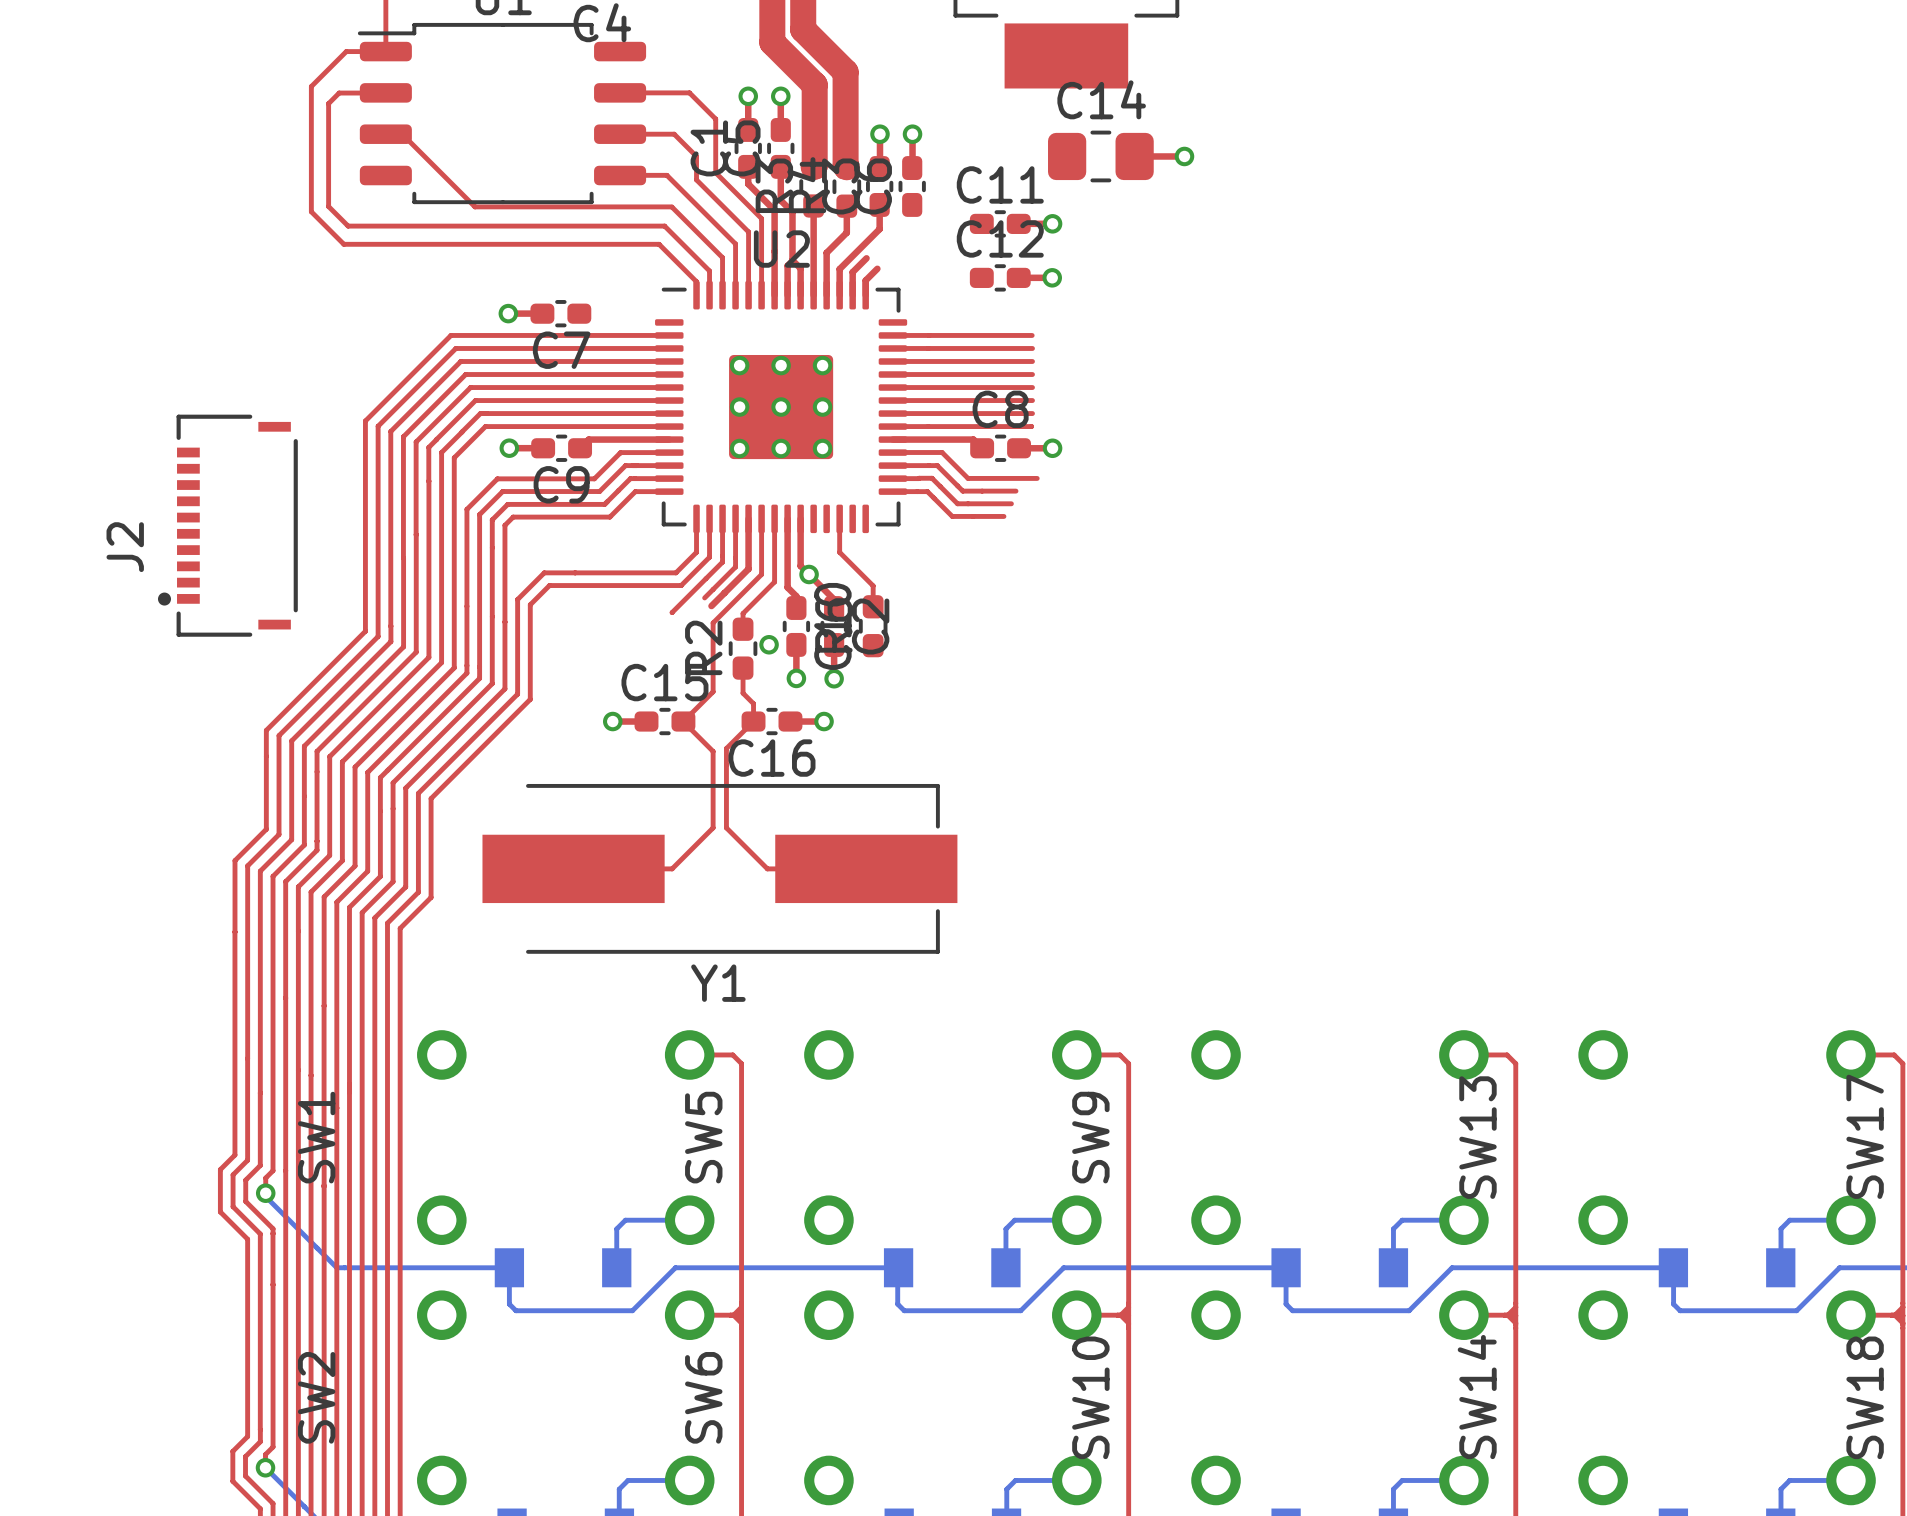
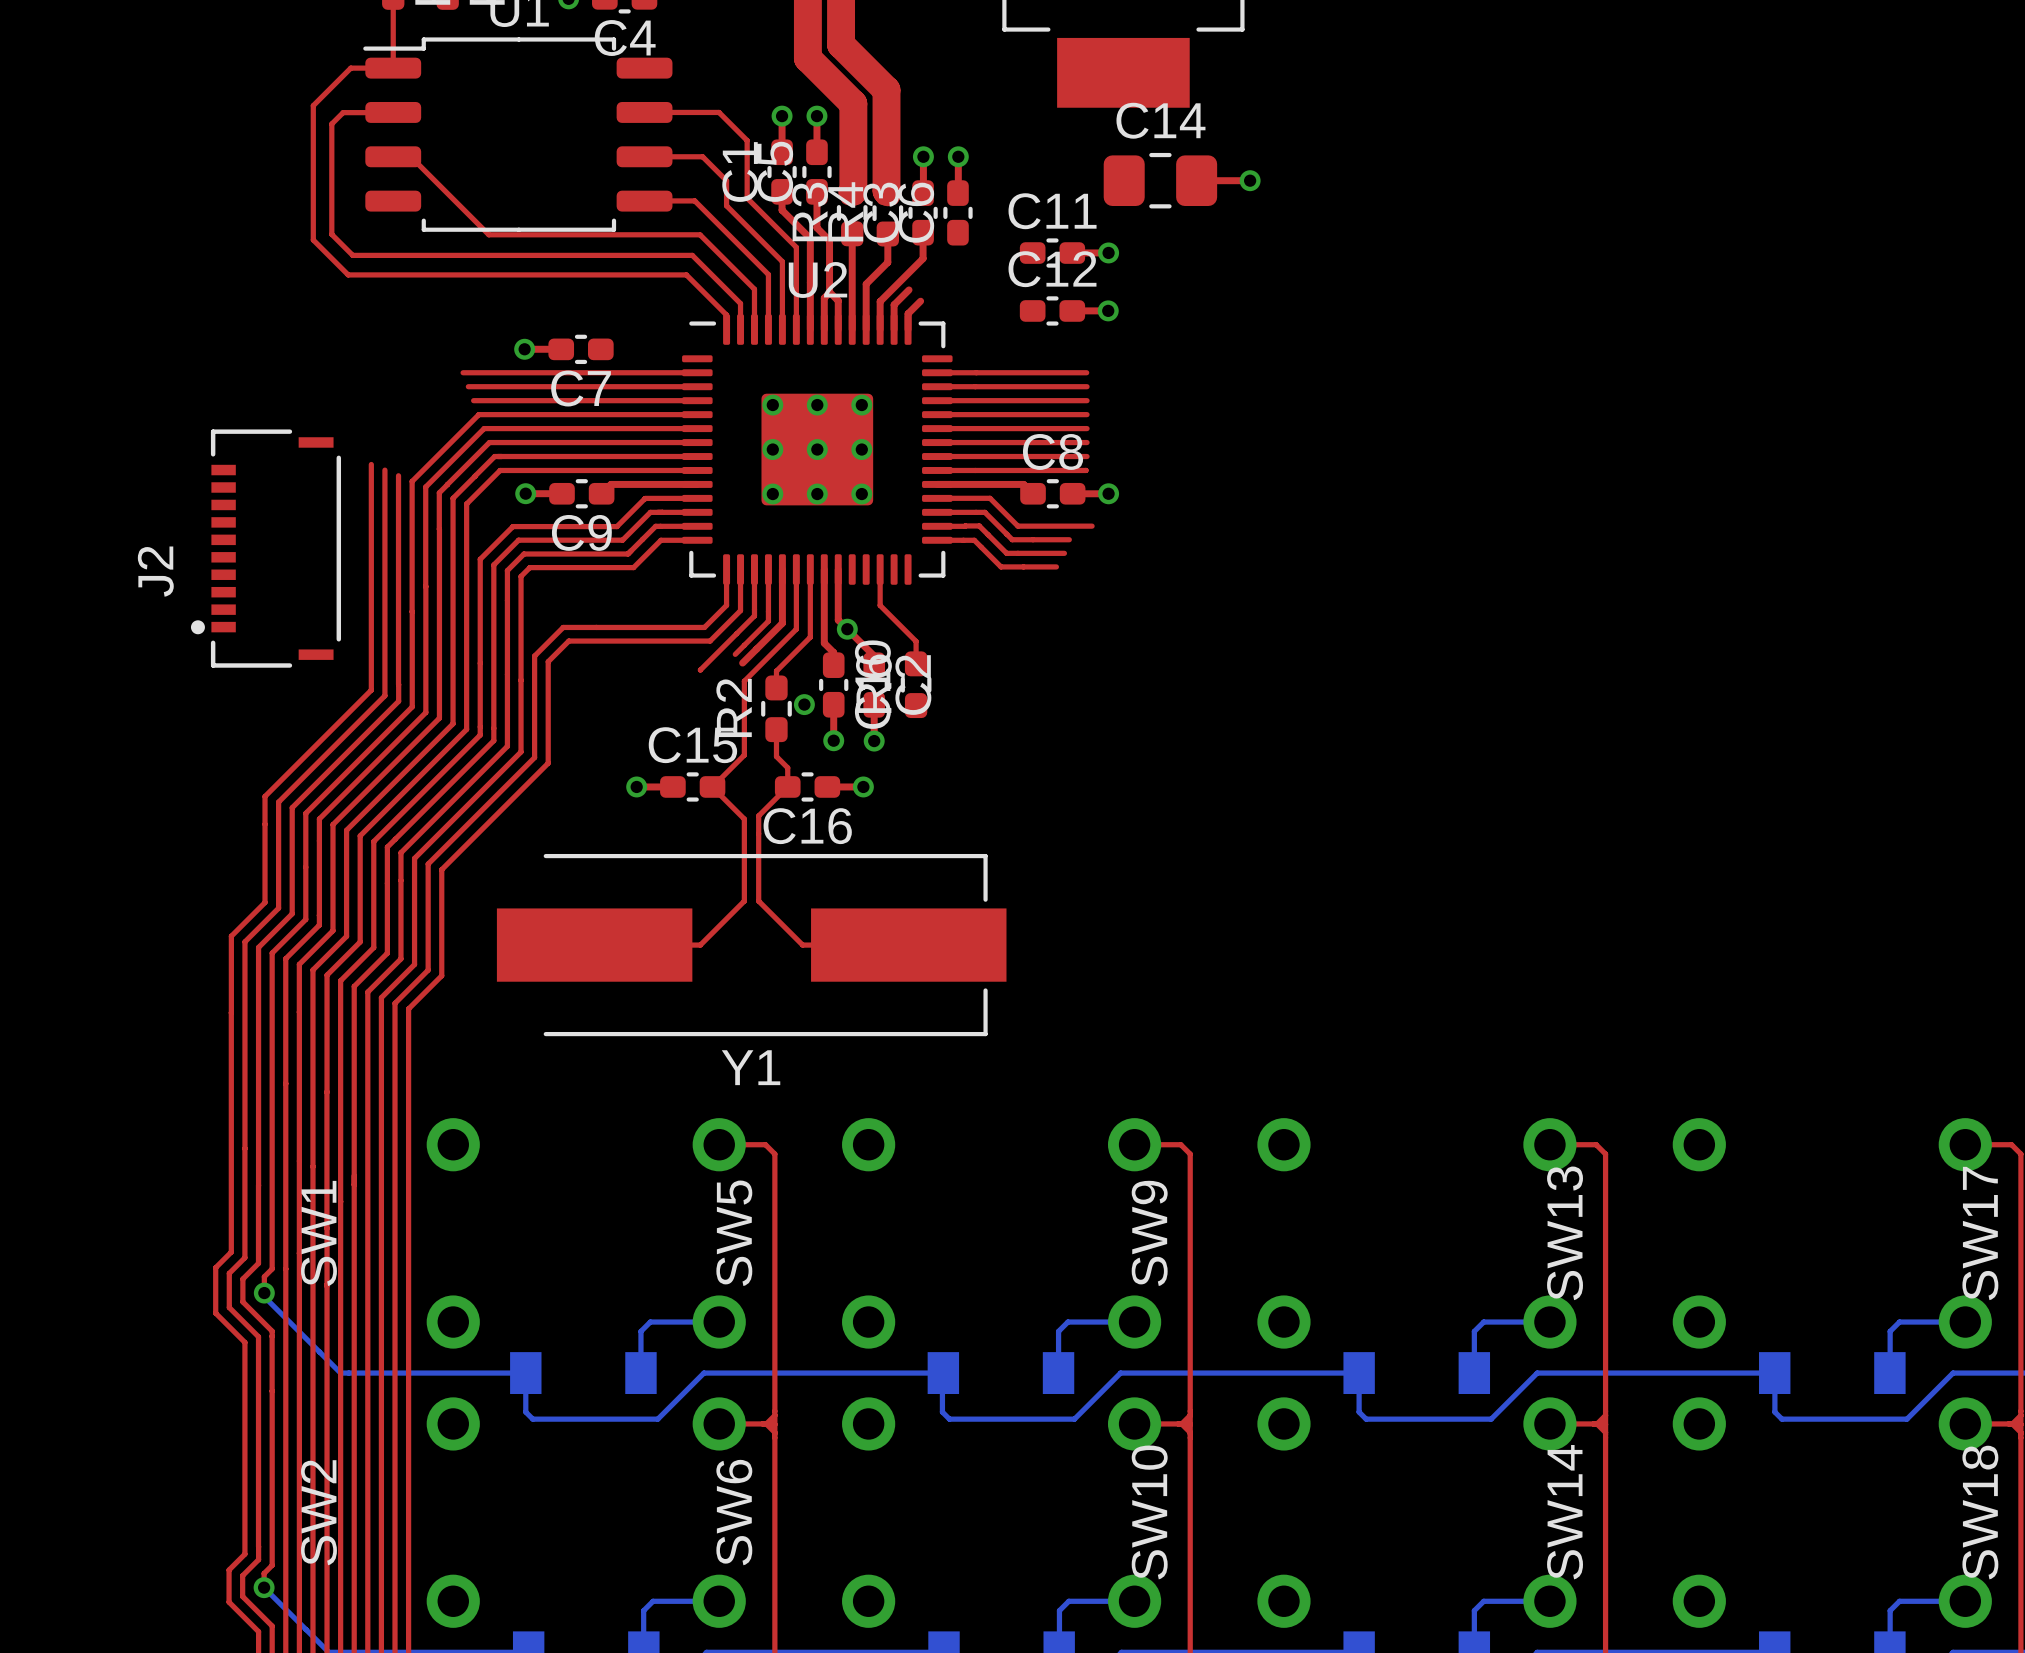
top track: (450, 335) (365, 421) -> none
top track: (455, 348) (378, 426) -> none
top track: (460, 361) (390, 431) -> none
J2 position: (227, 525) -> (265, 548)

